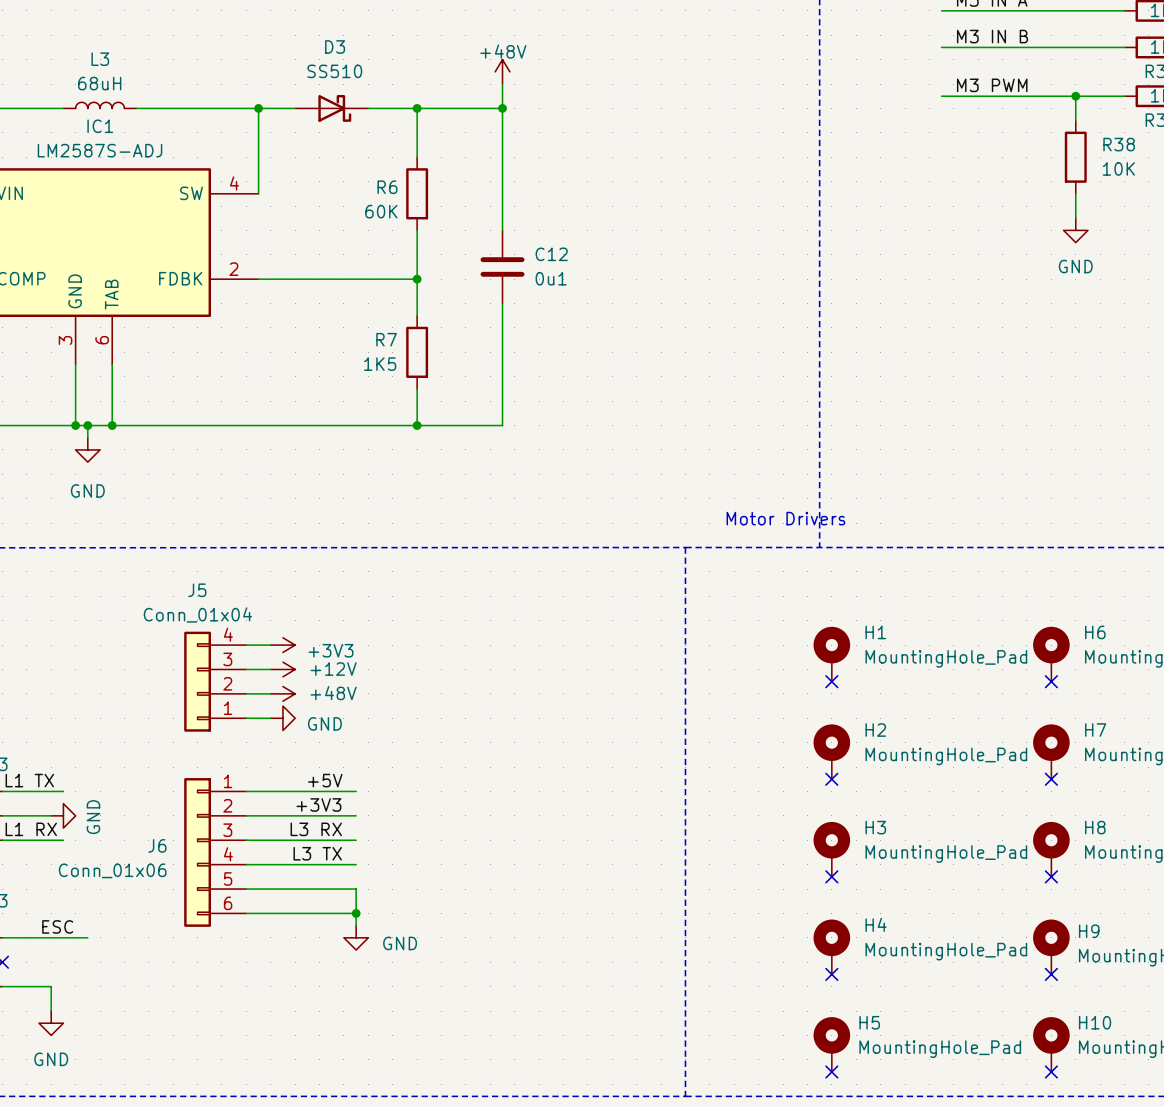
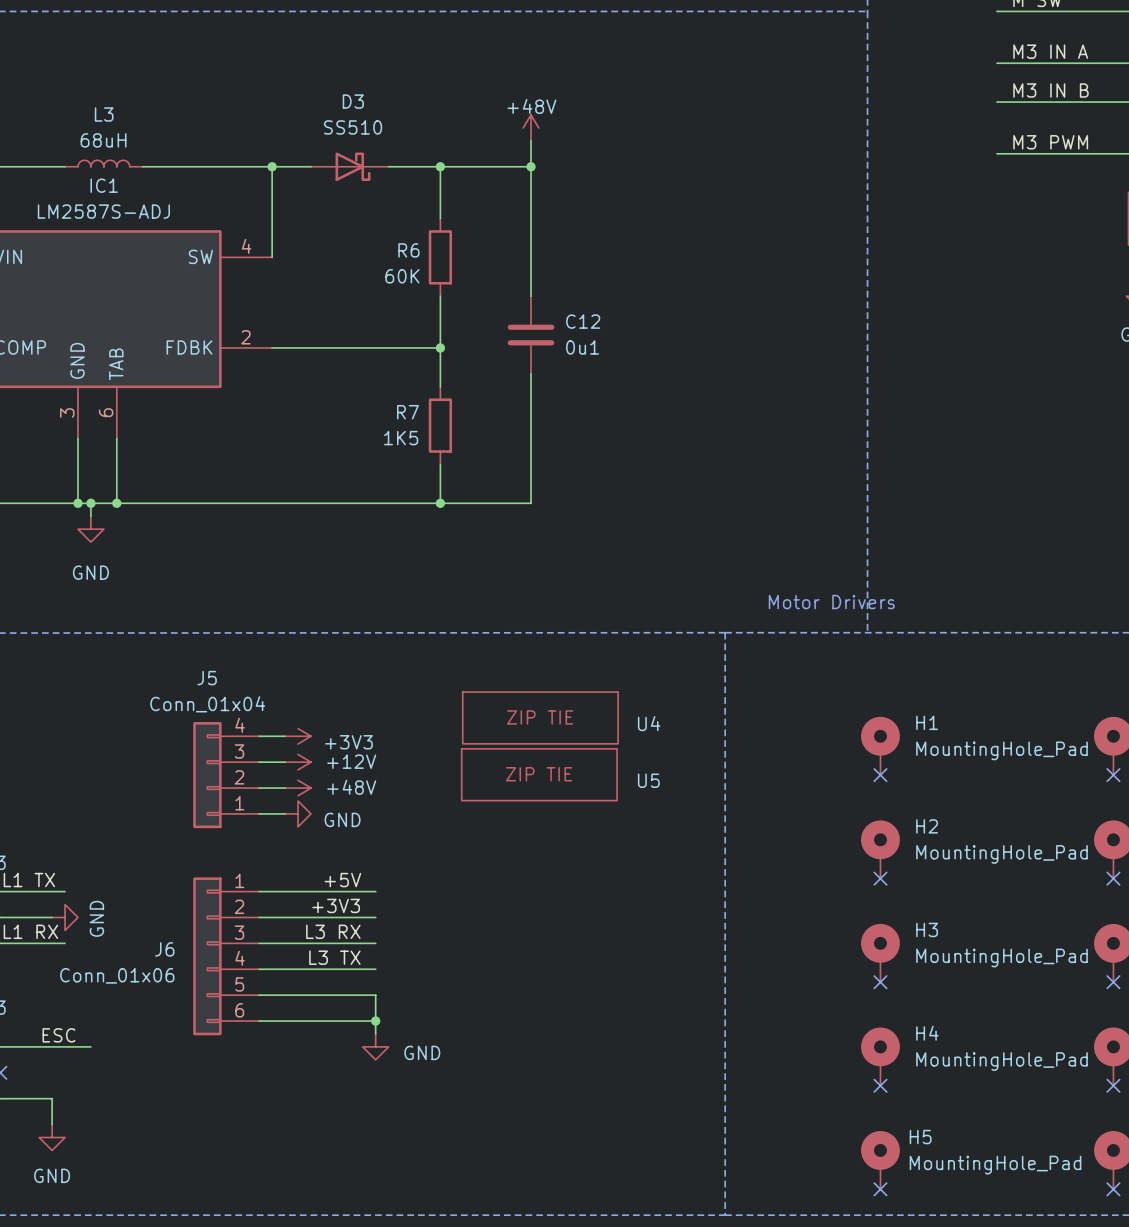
U4: none -> (540, 717)
U5: none -> (539, 774)

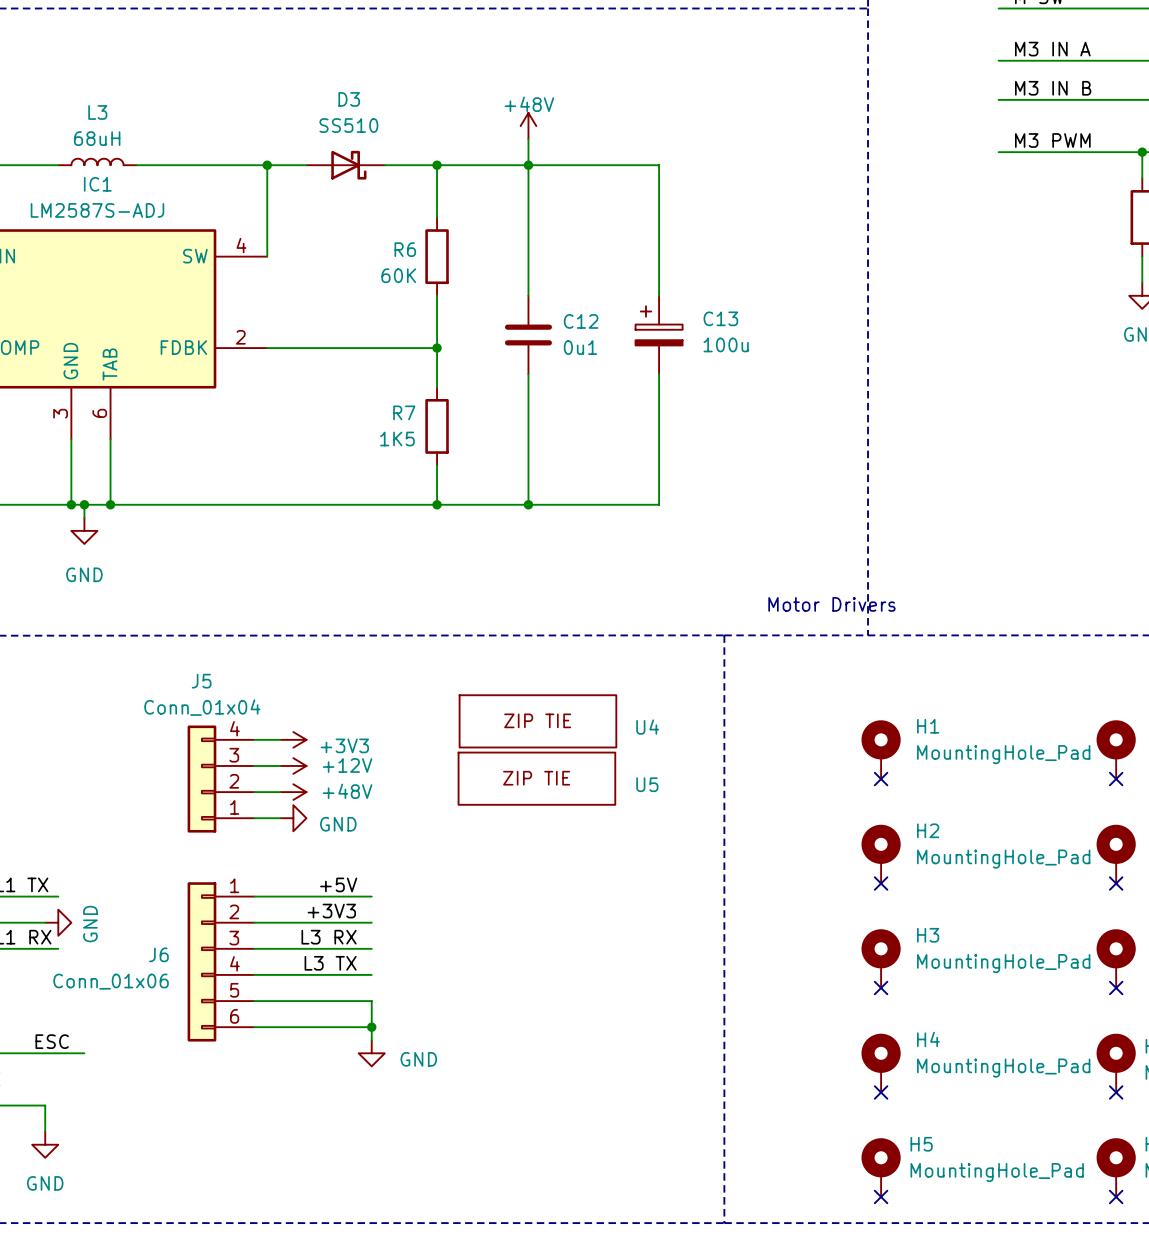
wire: none -> (528, 165) (659, 165) (659, 295)
C13: none -> 100u (659, 335)
wire: none -> (659, 374) (659, 504) (528, 504)
junction: none -> (528, 504)

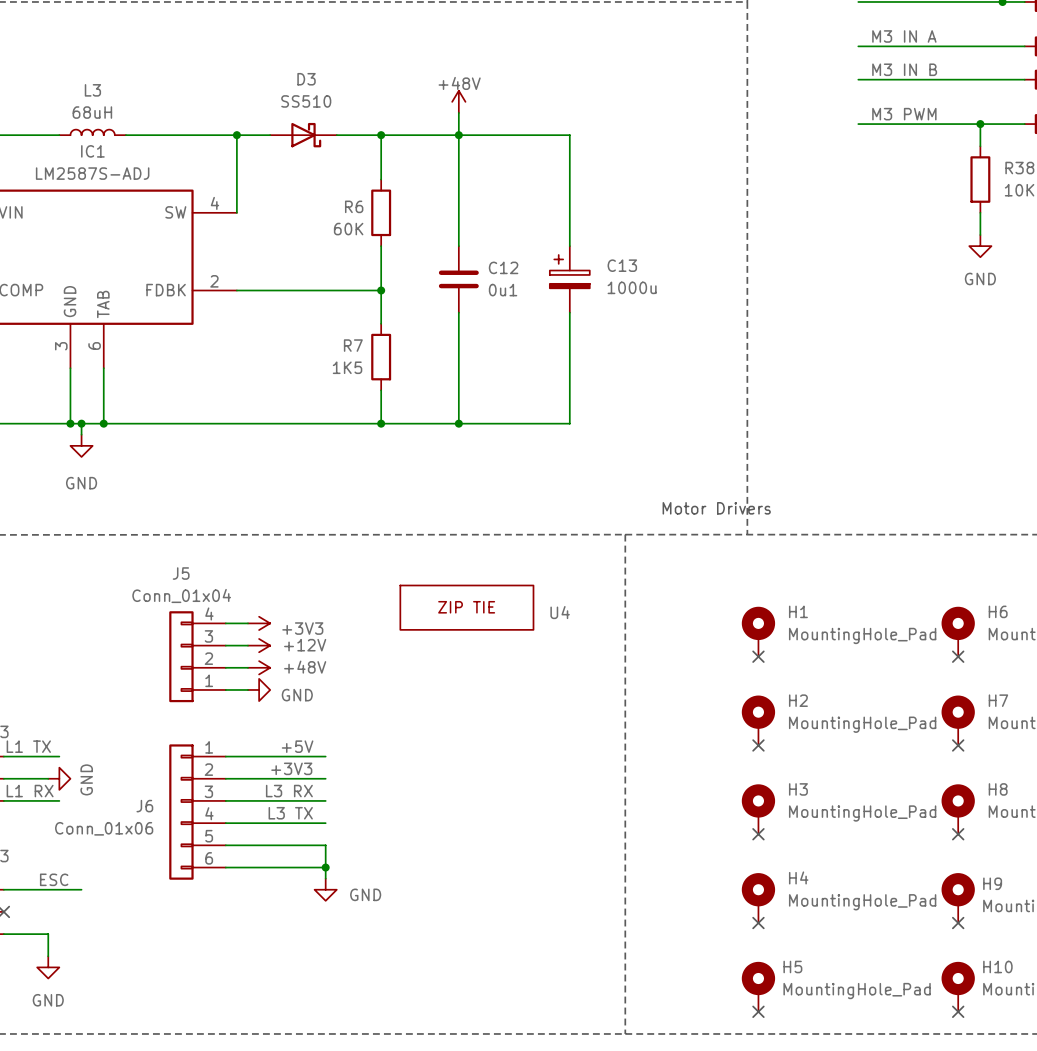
C13 value: 100u (726, 344) -> 1000u (632, 287)
U5: (536, 778) -> none

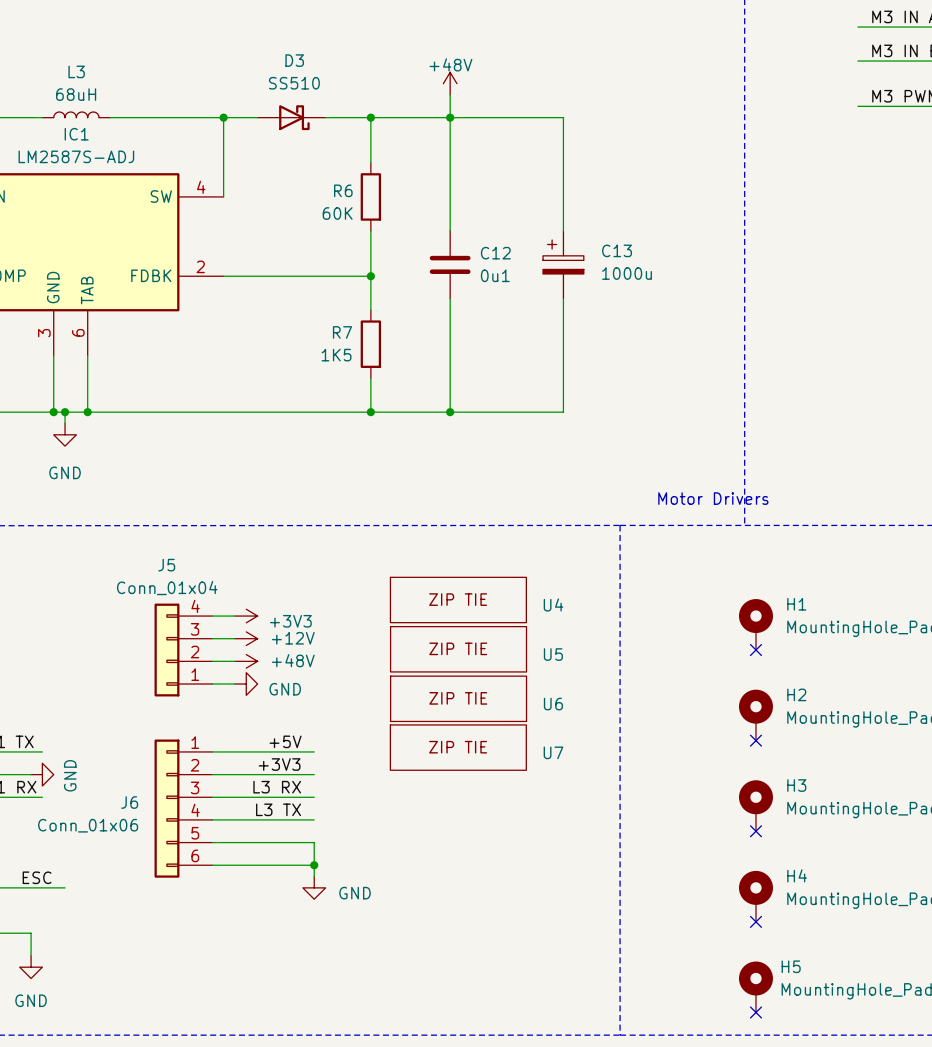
U5: none -> (458, 649)
U6: none -> (458, 698)
U7: none -> (458, 747)

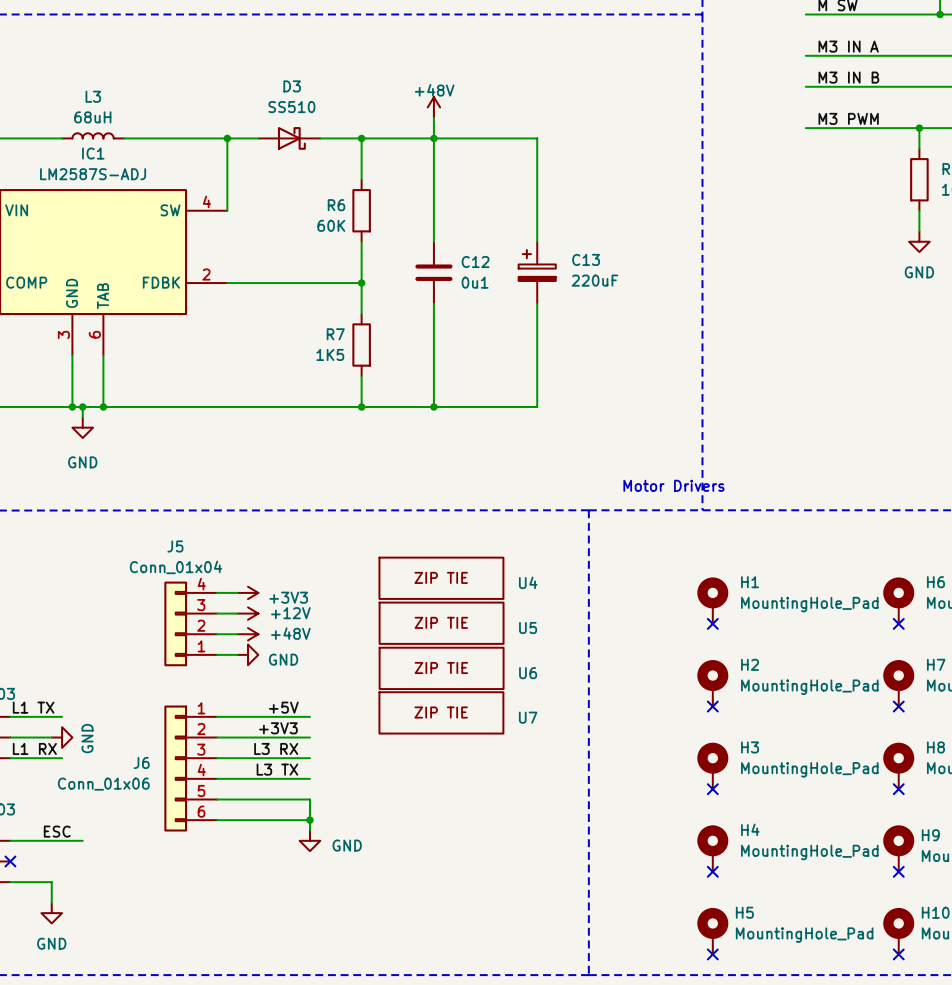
C13 value: 1000u (627, 273) -> 220uF (594, 280)

